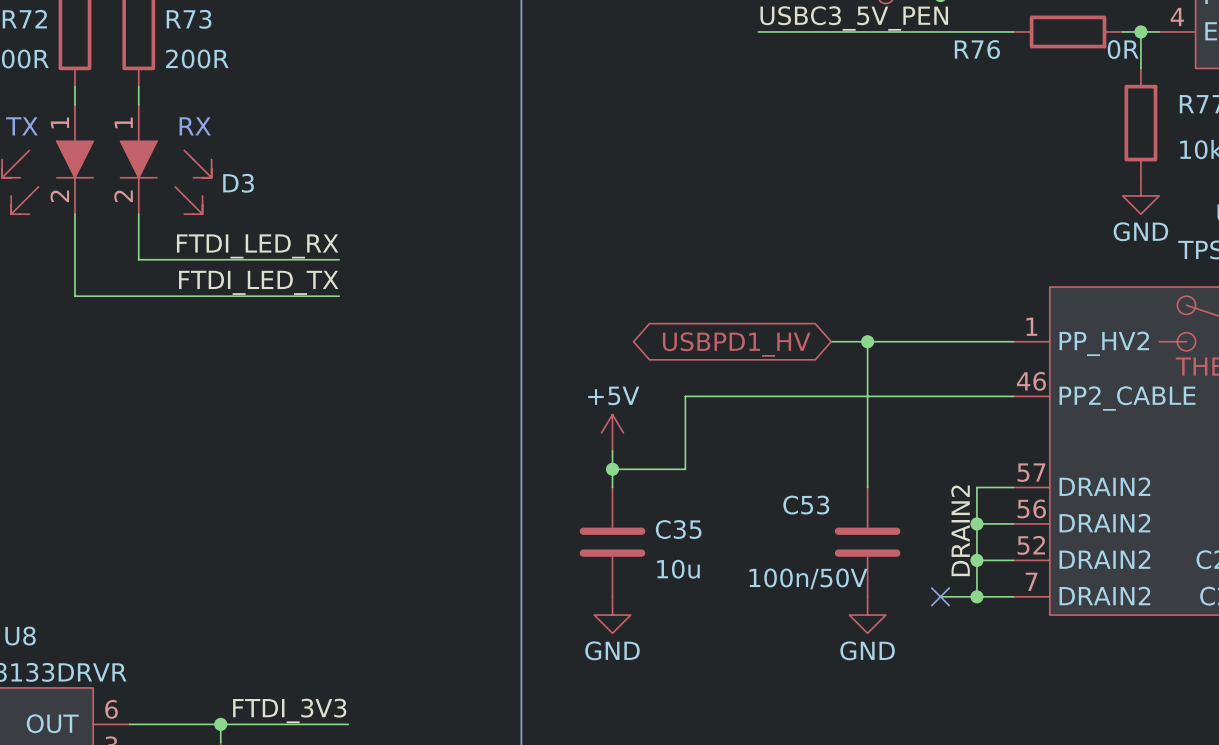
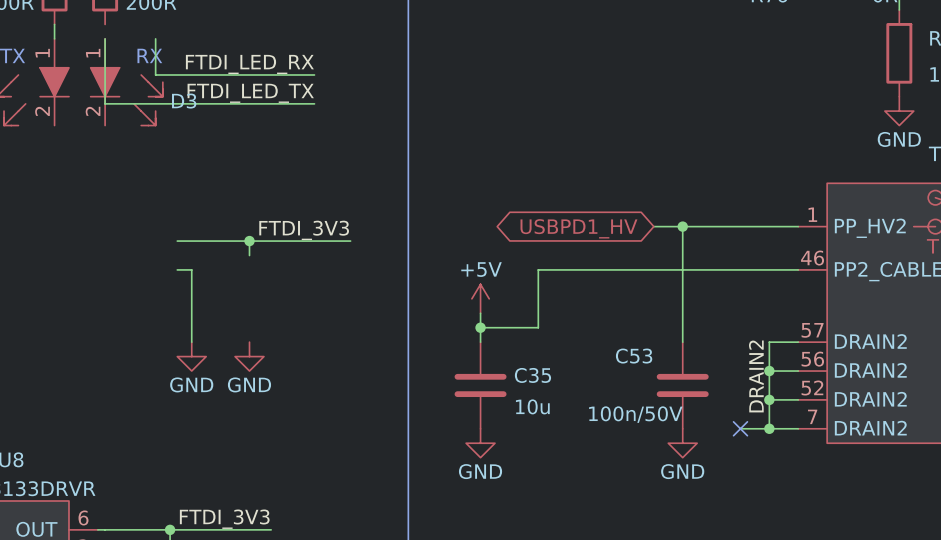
wire: (138, 86) (138, 104) -> (314, 103) (105, 103) (105, 38)
wire: (74, 214) (74, 296) (339, 296) -> none
wire: (138, 214) (138, 259) (339, 259) -> (155, 38) (155, 74) (314, 74)
label position: FTDI_LED_RX (257, 246) -> FTDI_LED_RX (249, 64)
label position: FTDI_LED_TX (258, 282) -> FTDI_LED_TX (250, 93)
label: none -> FTDI_3V3 (304, 230)
wire: none -> (177, 241) (350, 241)
wire: none -> (249, 241) (249, 255)
junction: none -> (249, 241)
wire: none -> (177, 269) (191, 269) (191, 342)
power symbol: none -> GND (191, 356)
power symbol: none -> GND (249, 356)

